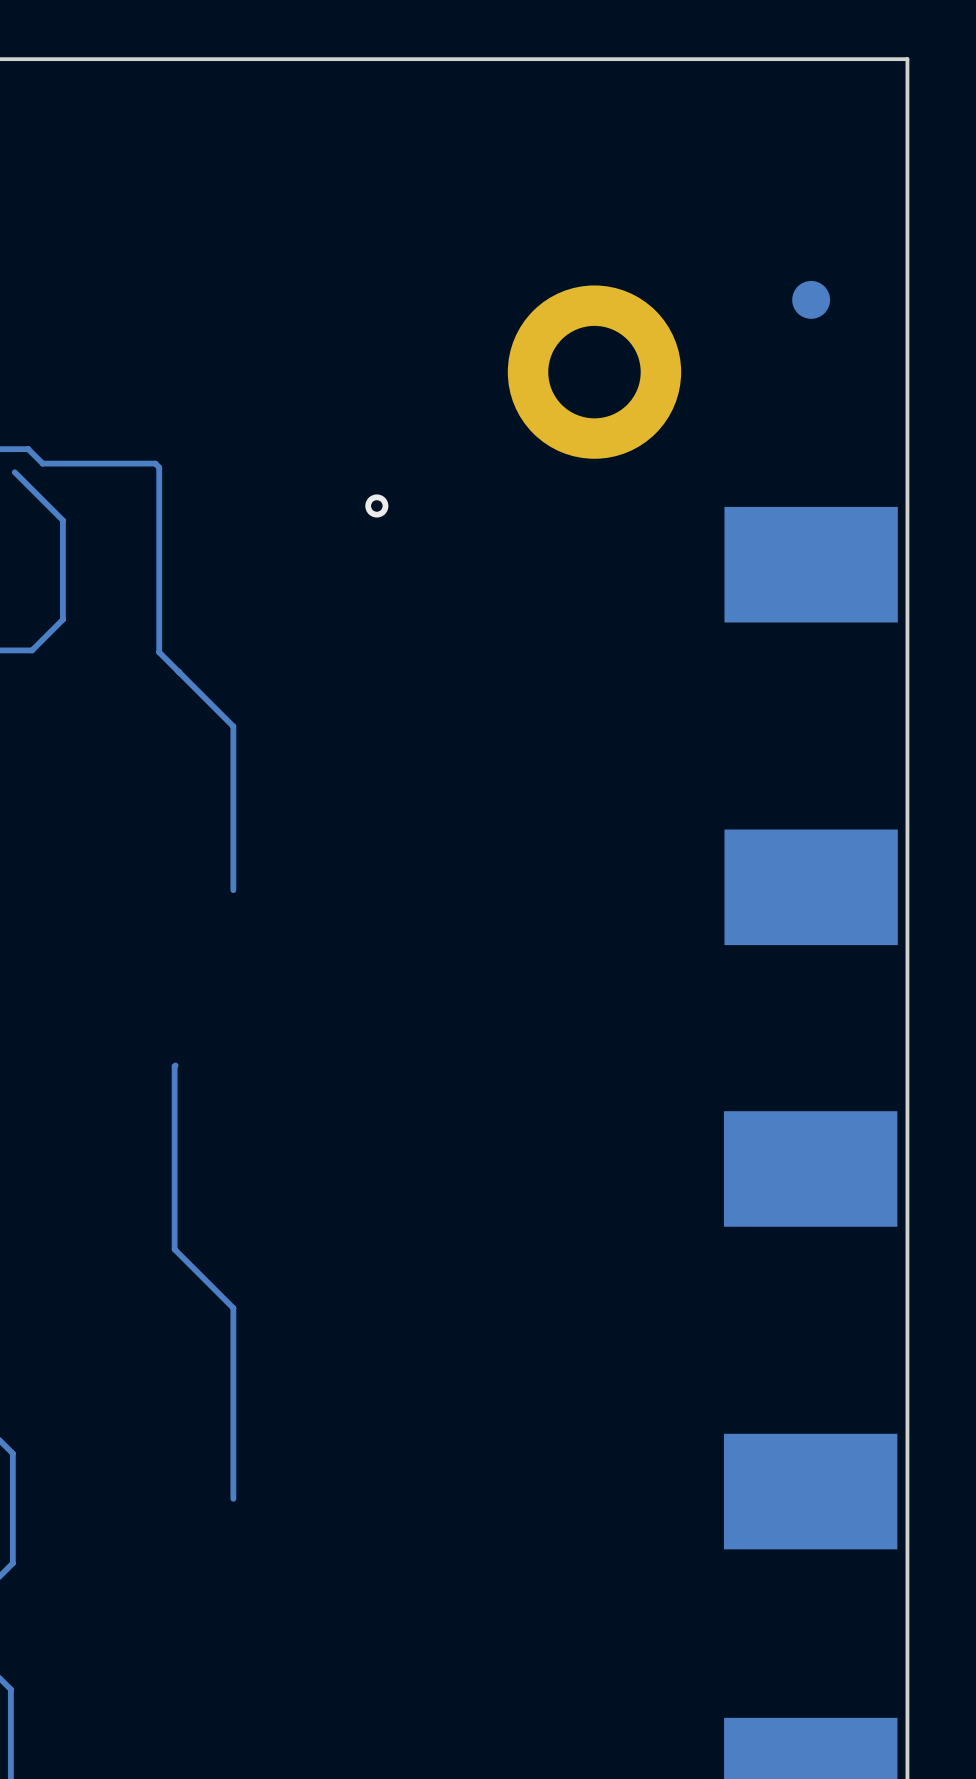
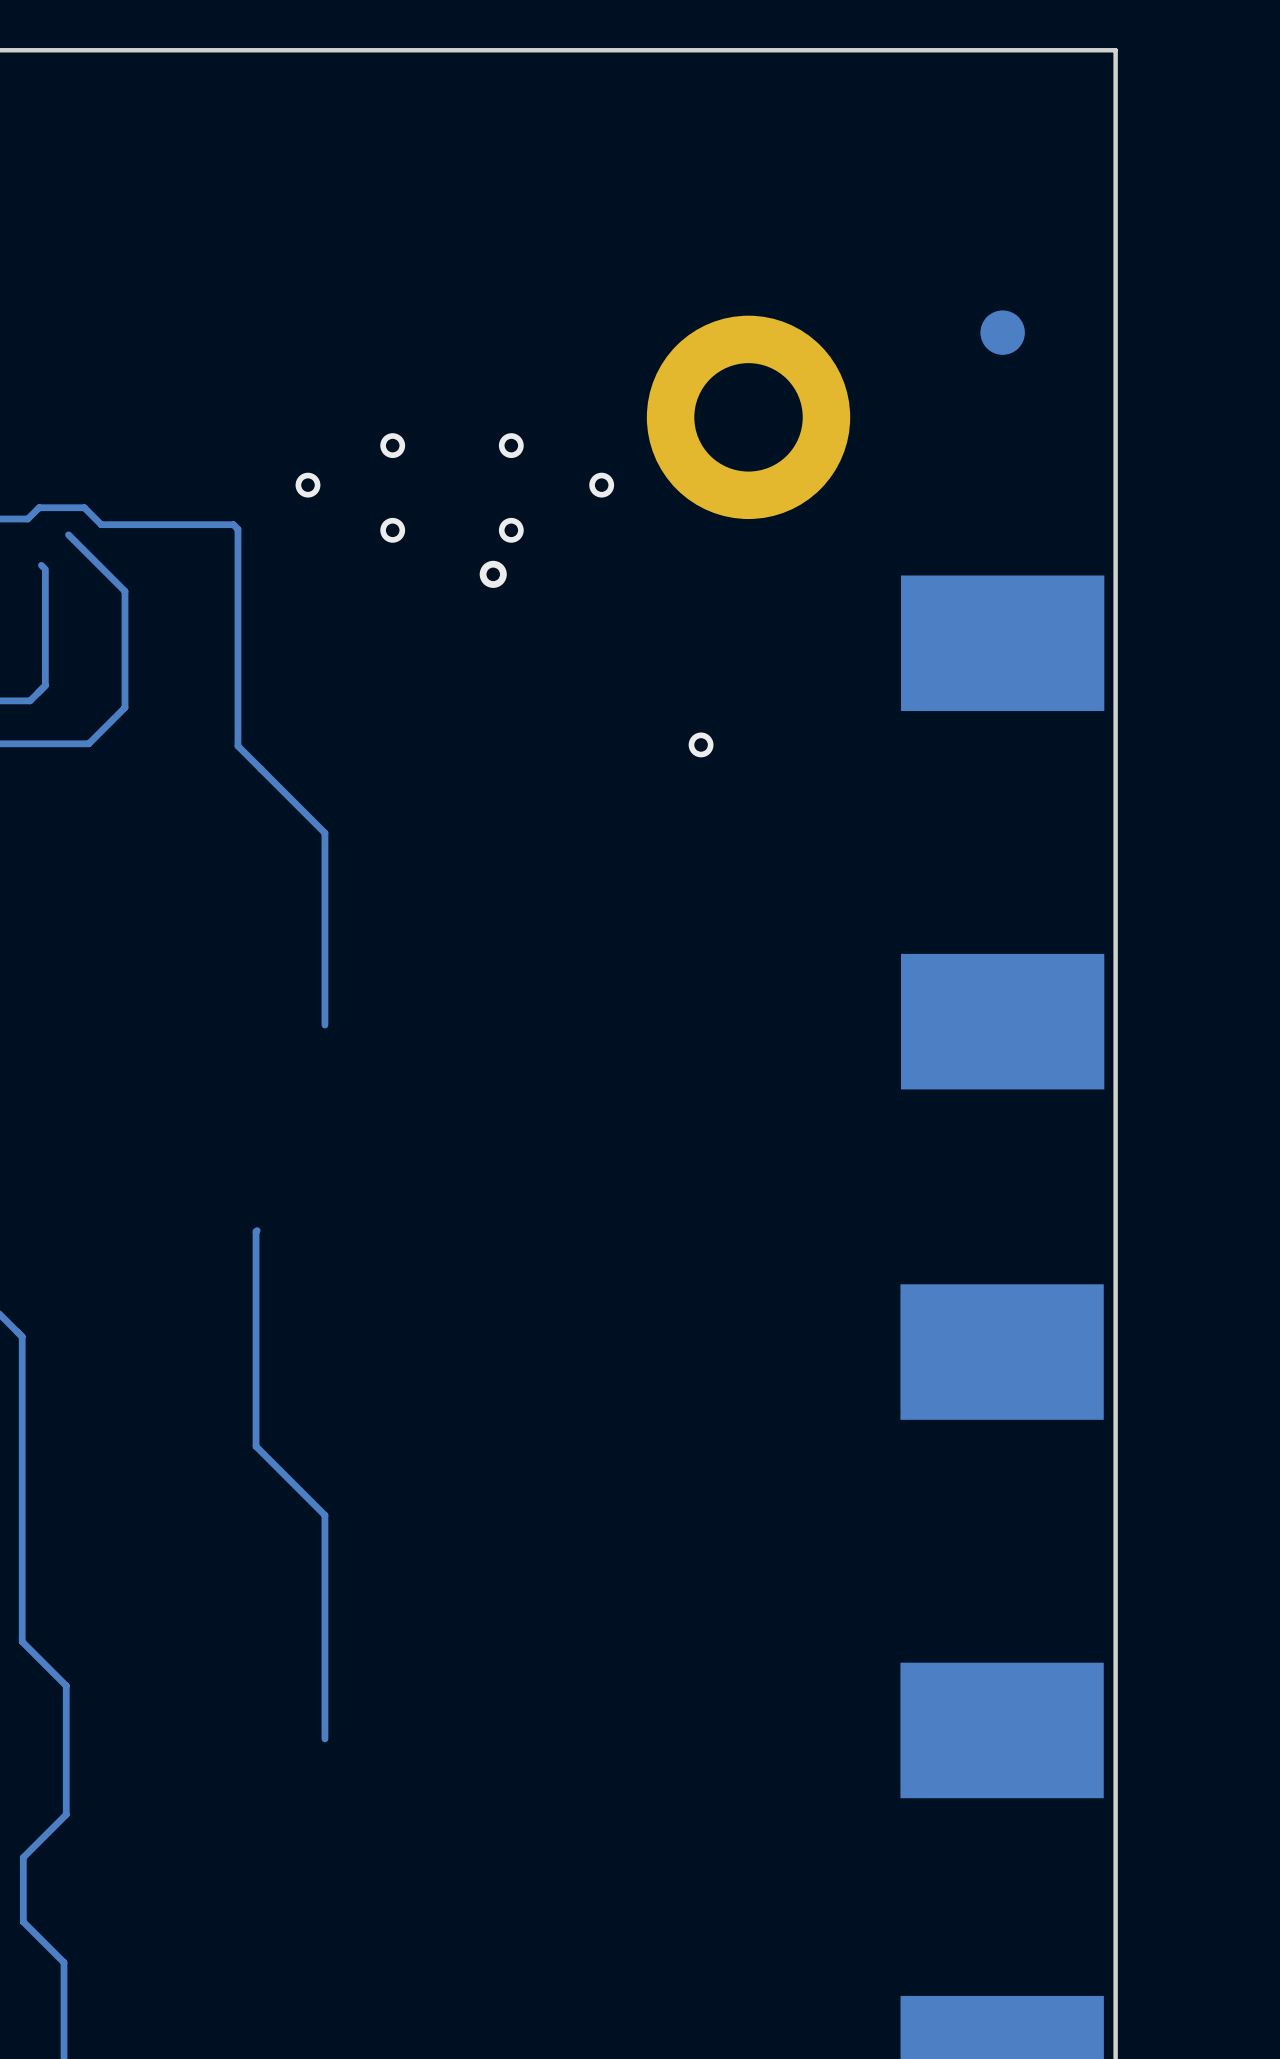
via: none -> (392, 445)
via: none -> (511, 445)
via: none -> (307, 485)
via: none -> (601, 485)
via: none -> (392, 530)
via: none -> (511, 530)
via: none -> (701, 744)

